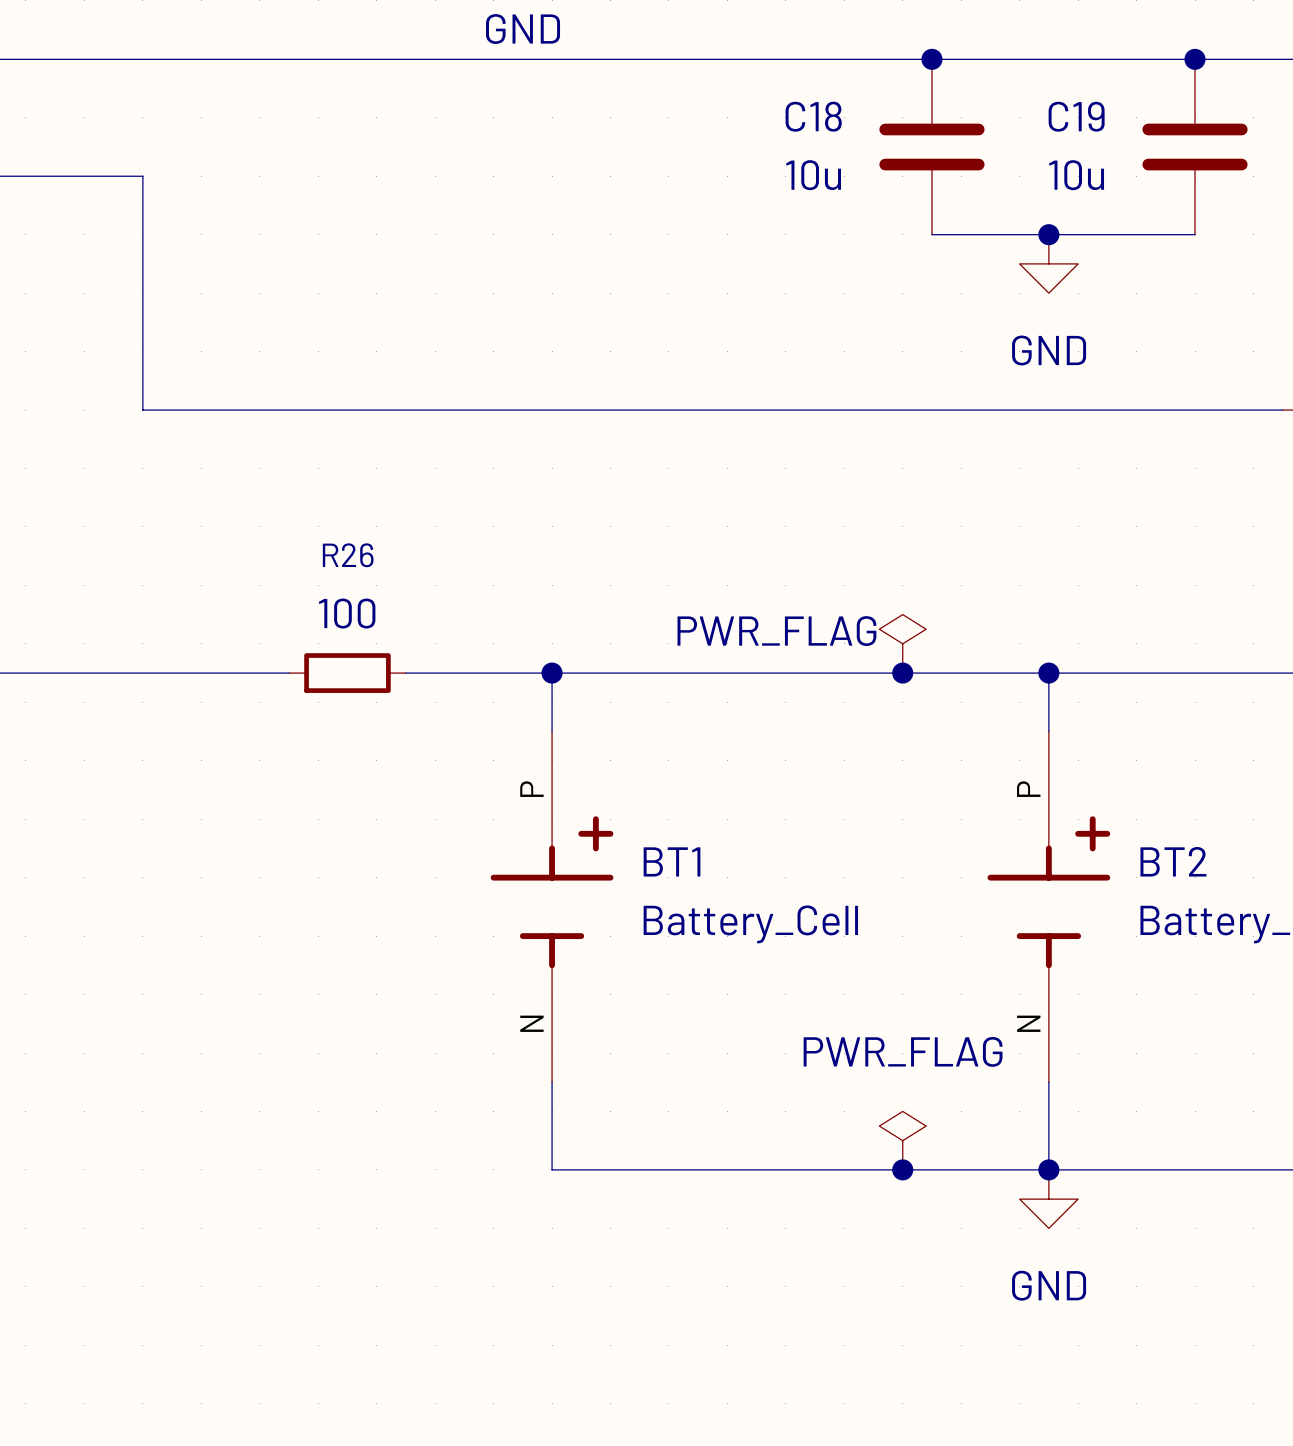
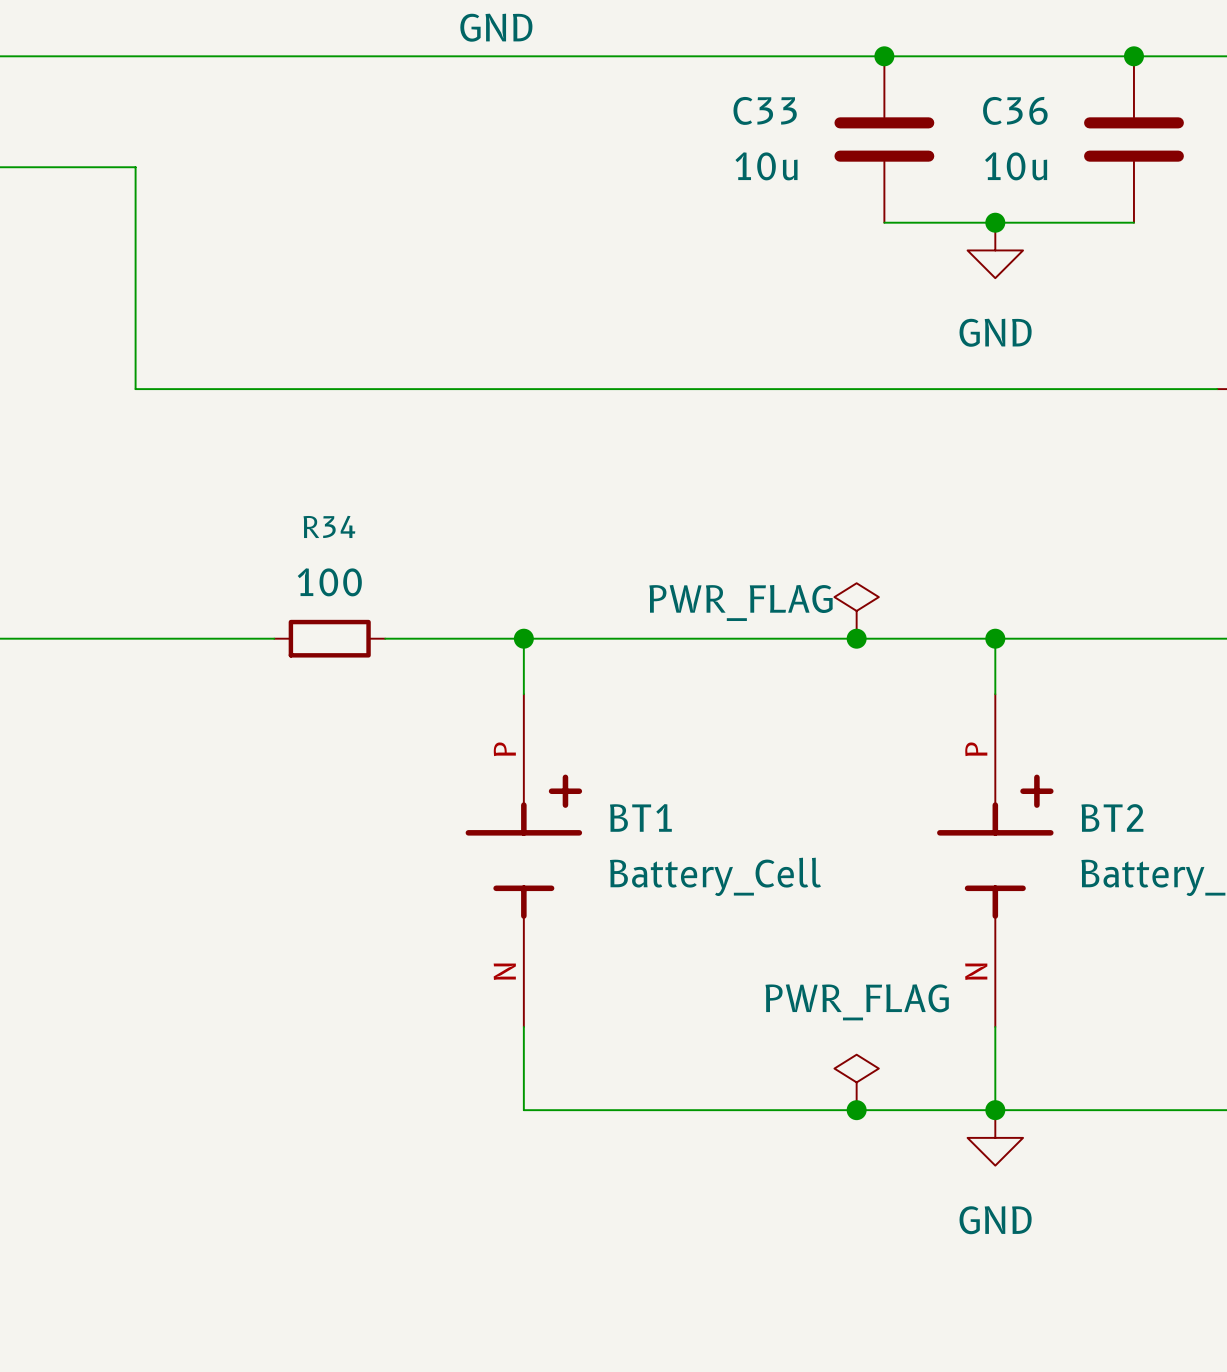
C18 name: C18 (813, 116) -> C33 (765, 110)
C19 name: C19 (1076, 116) -> C36 (1015, 110)
R26 name: R26 (348, 555) -> R34 (329, 526)

